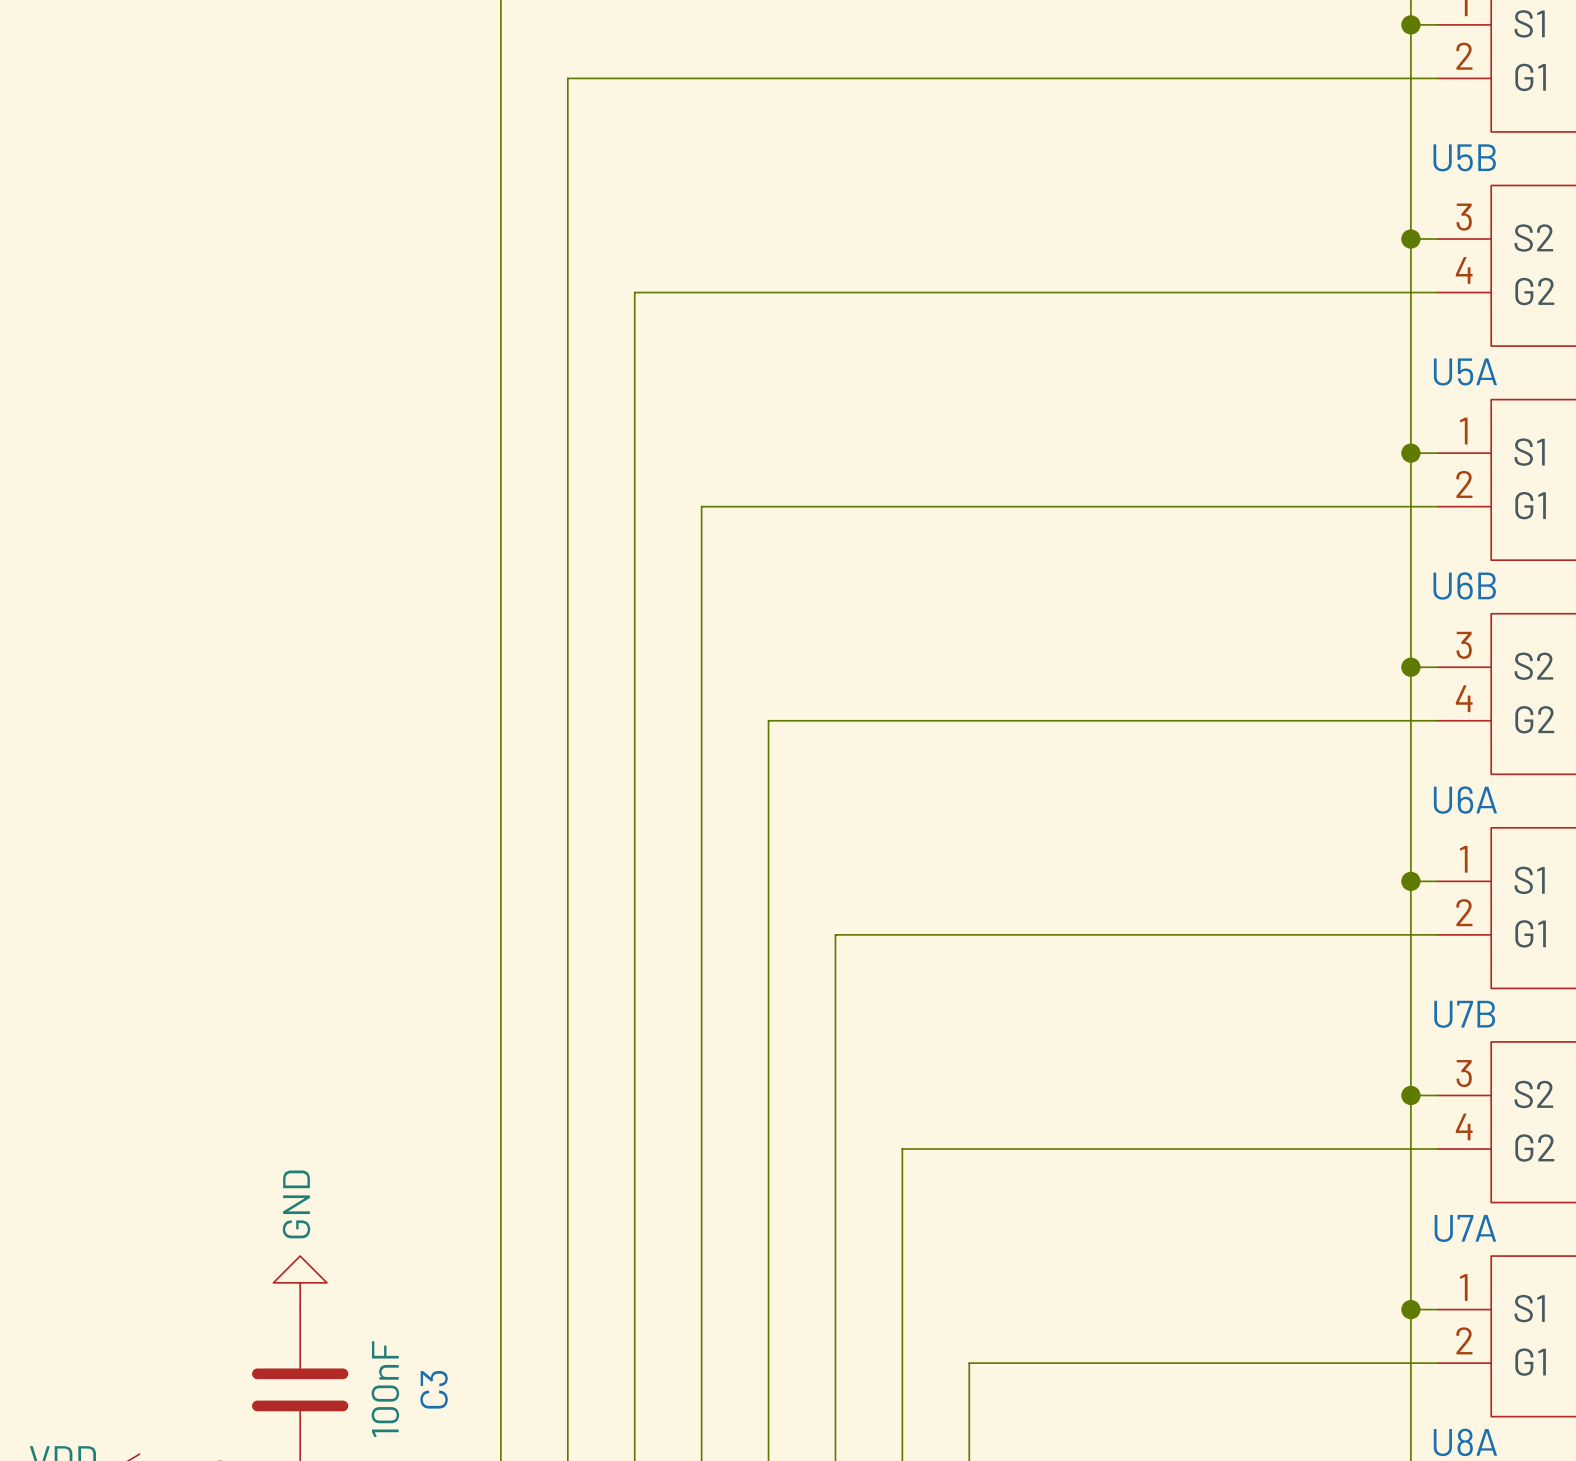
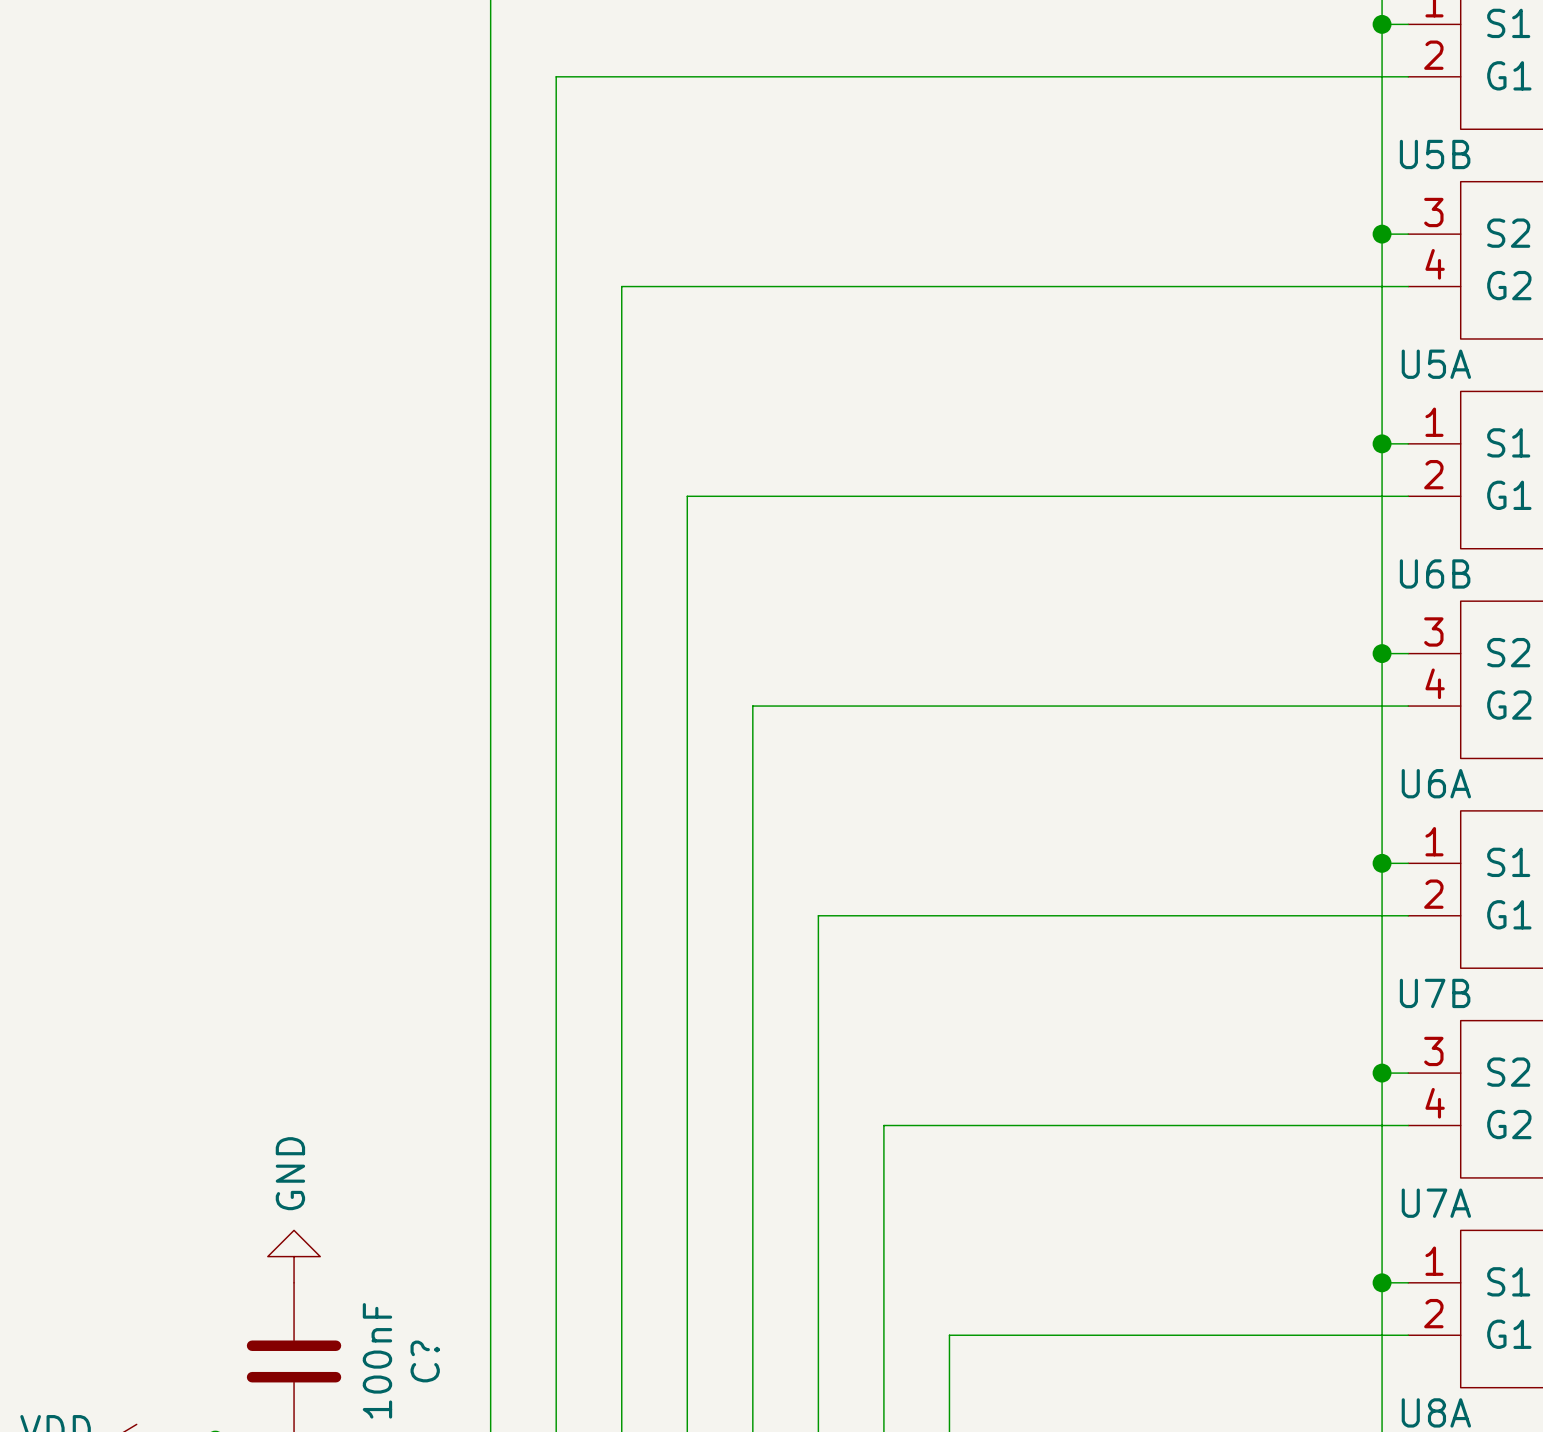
C3 name: C3 (434, 1389) -> C? (425, 1361)

